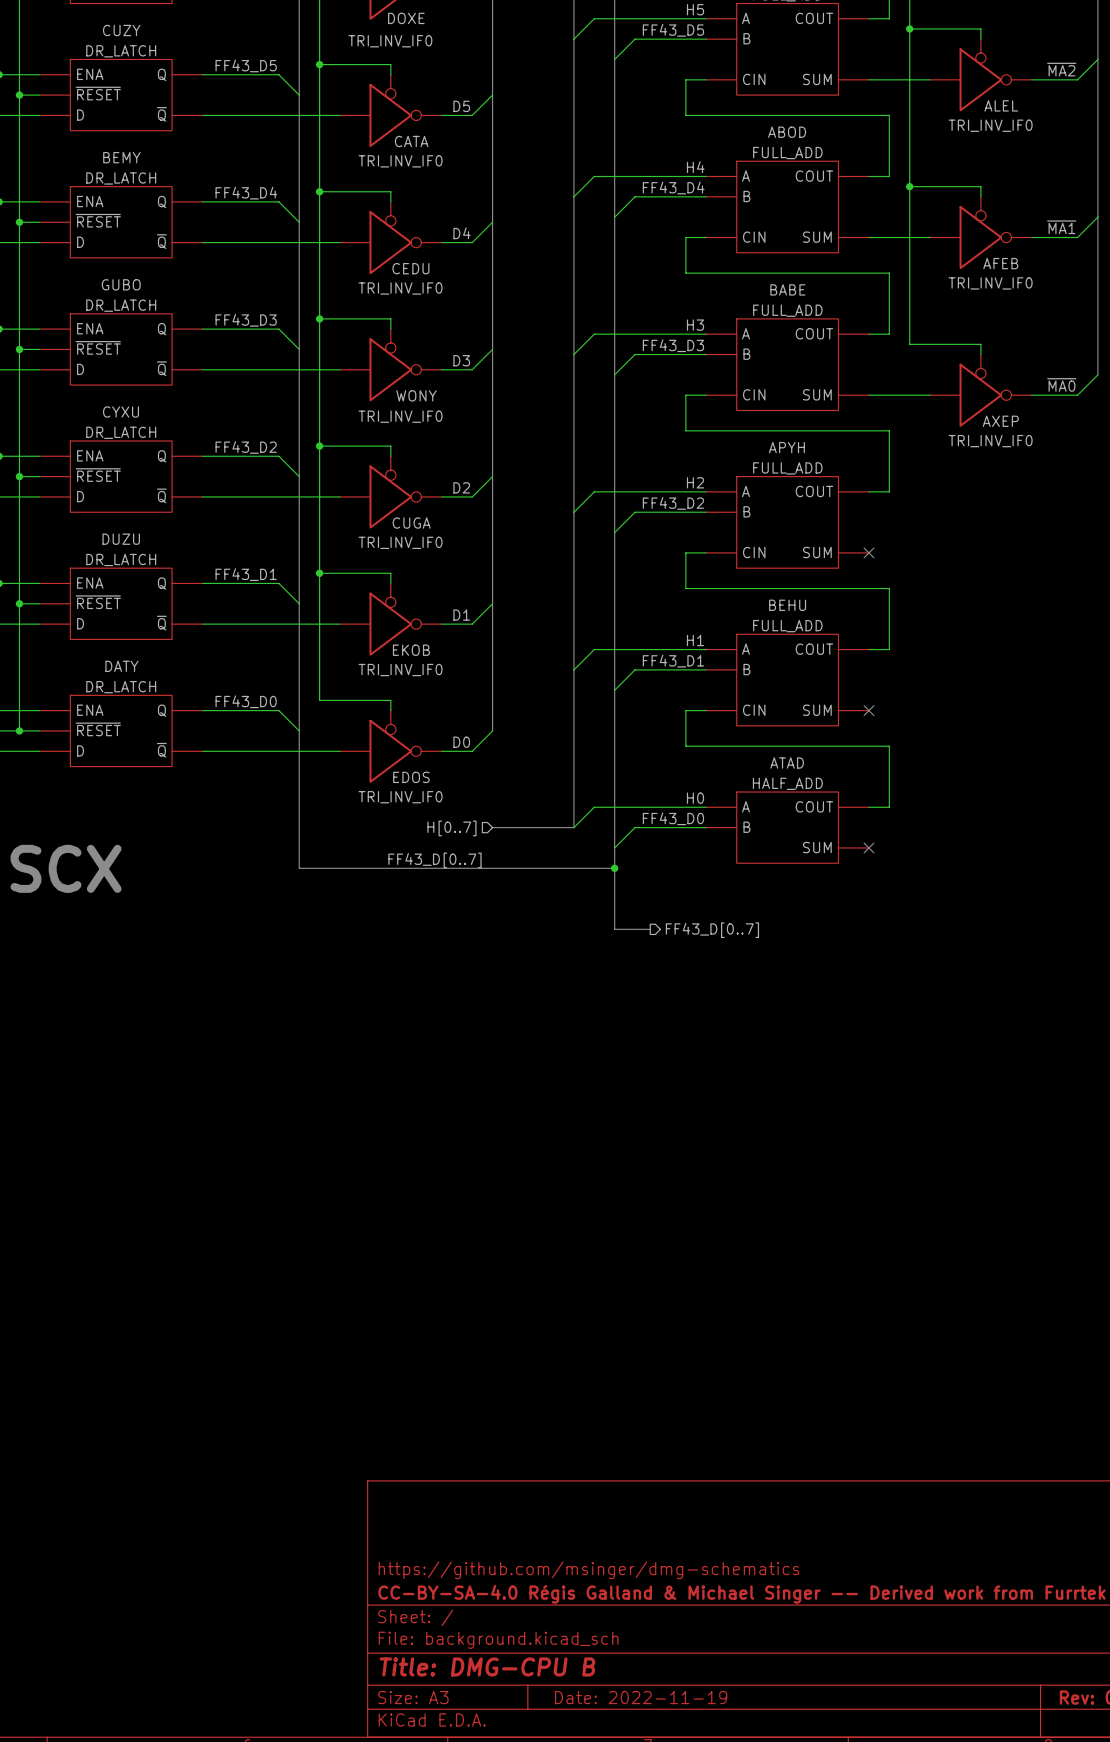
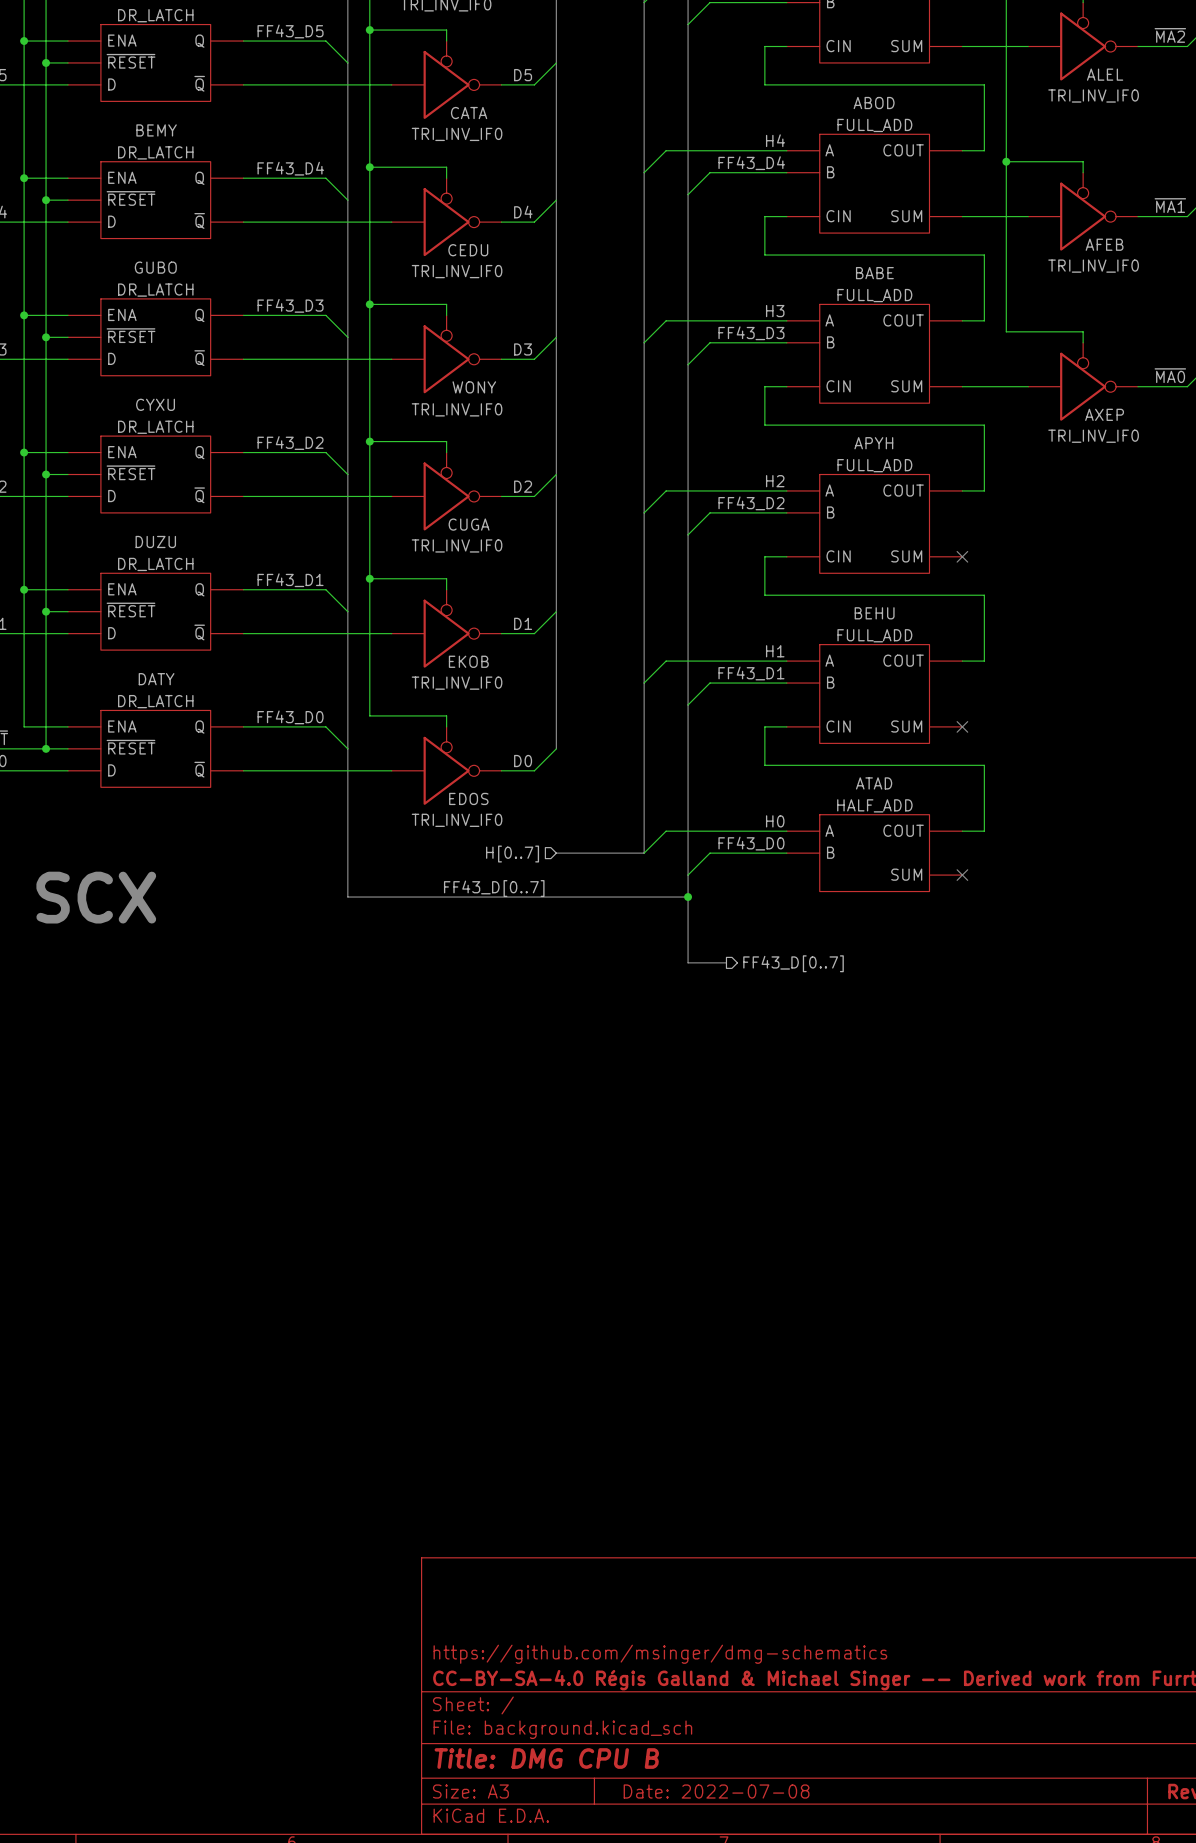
title block: Title: DMG-CPU B (487, 1666) -> Title: DMG CPU B (546, 1758)
title block: Date: 2022-11-19 (641, 1697) -> Date: 2022-07-08 (716, 1791)

